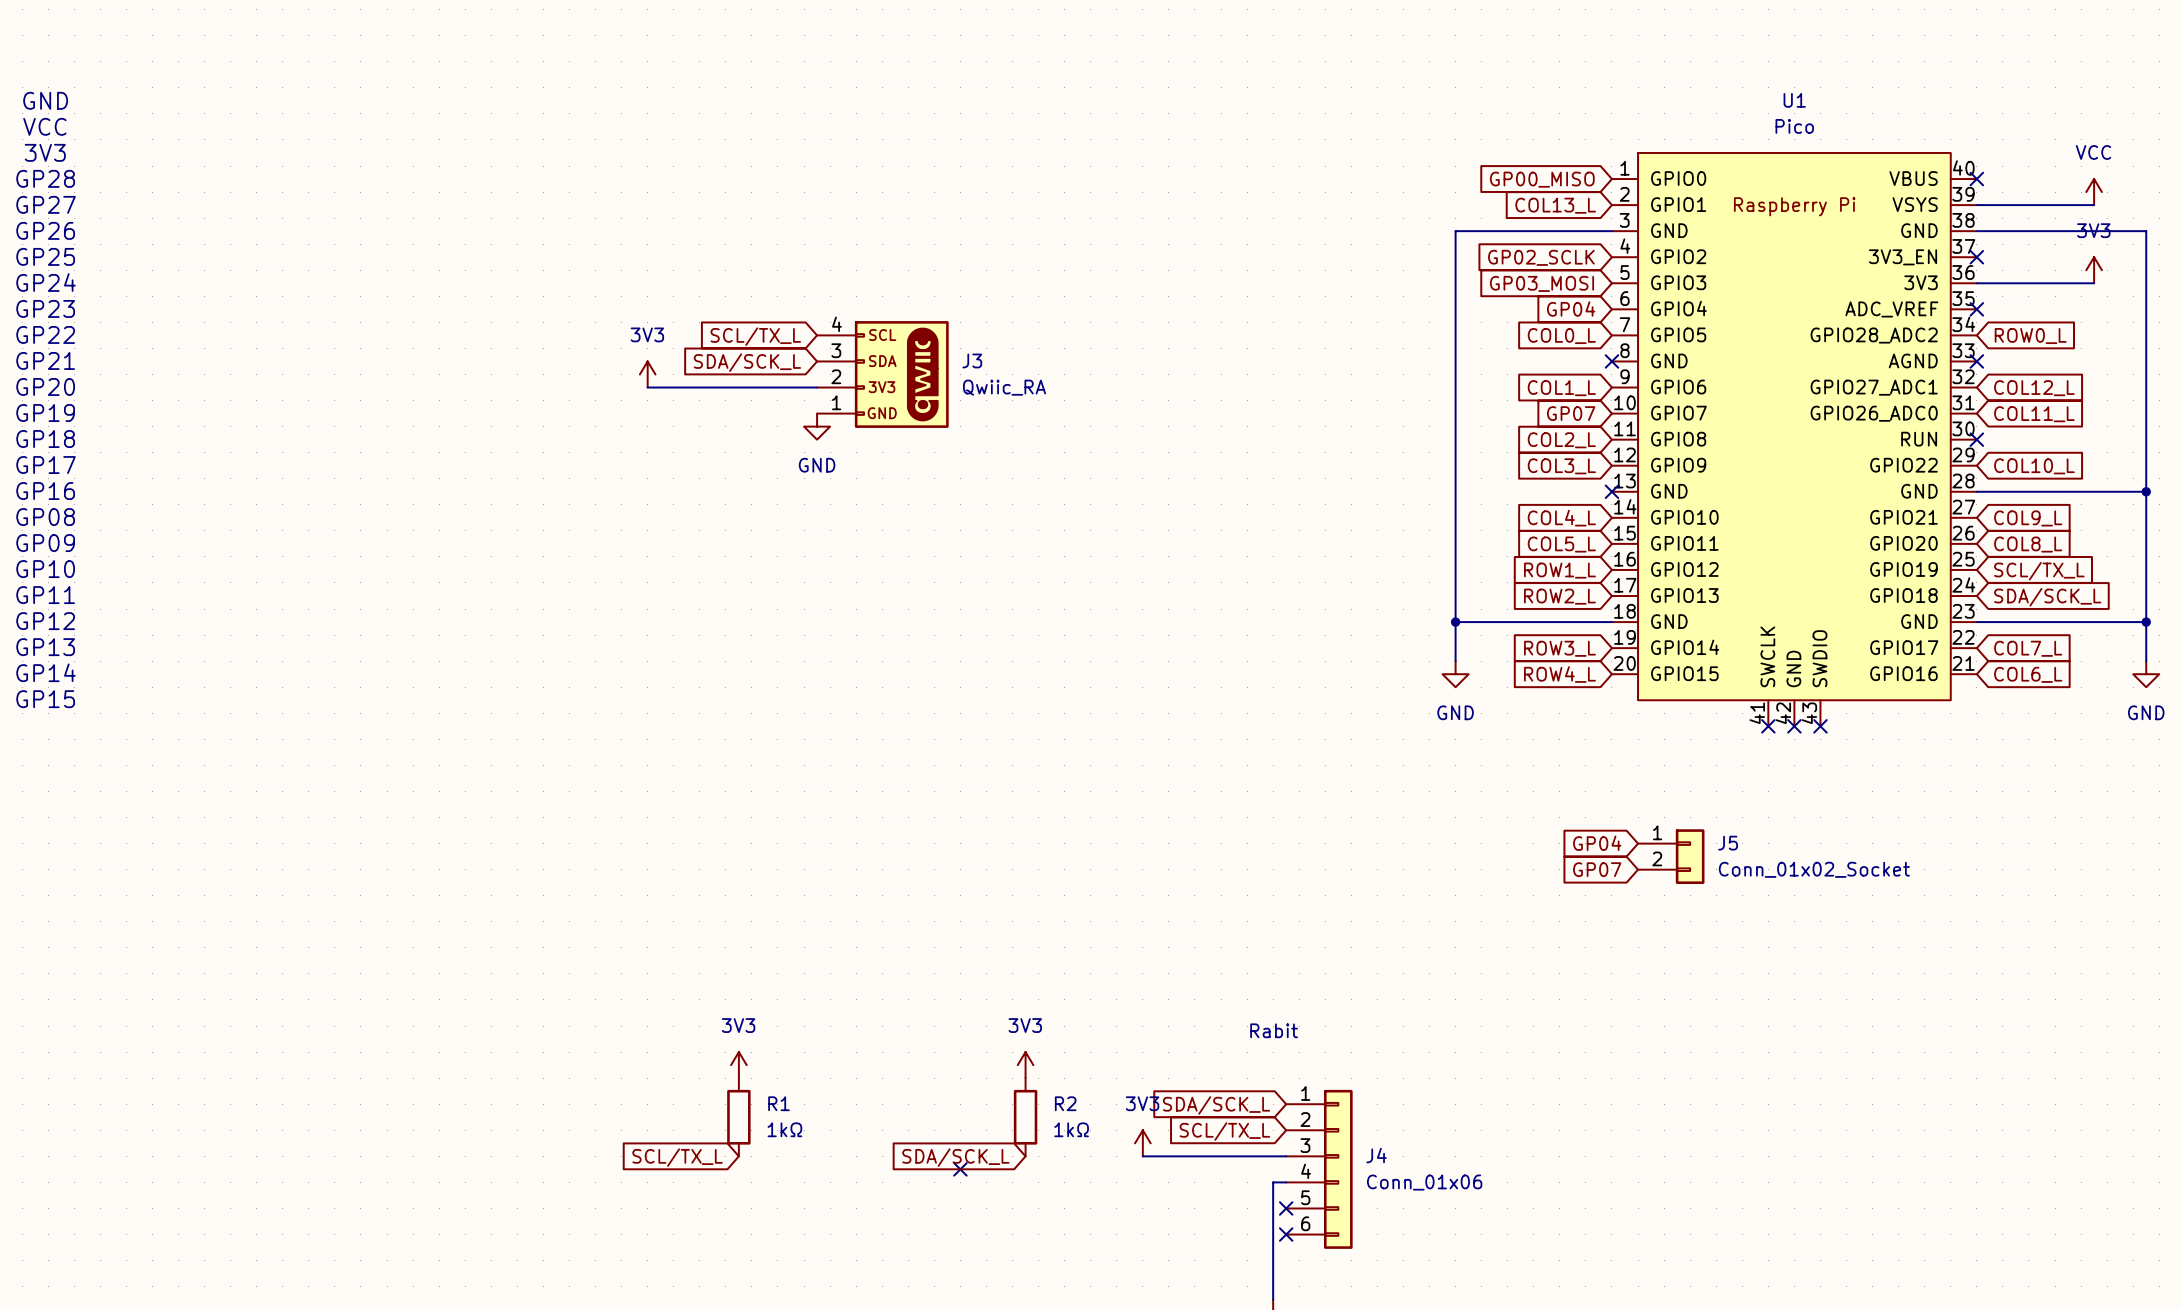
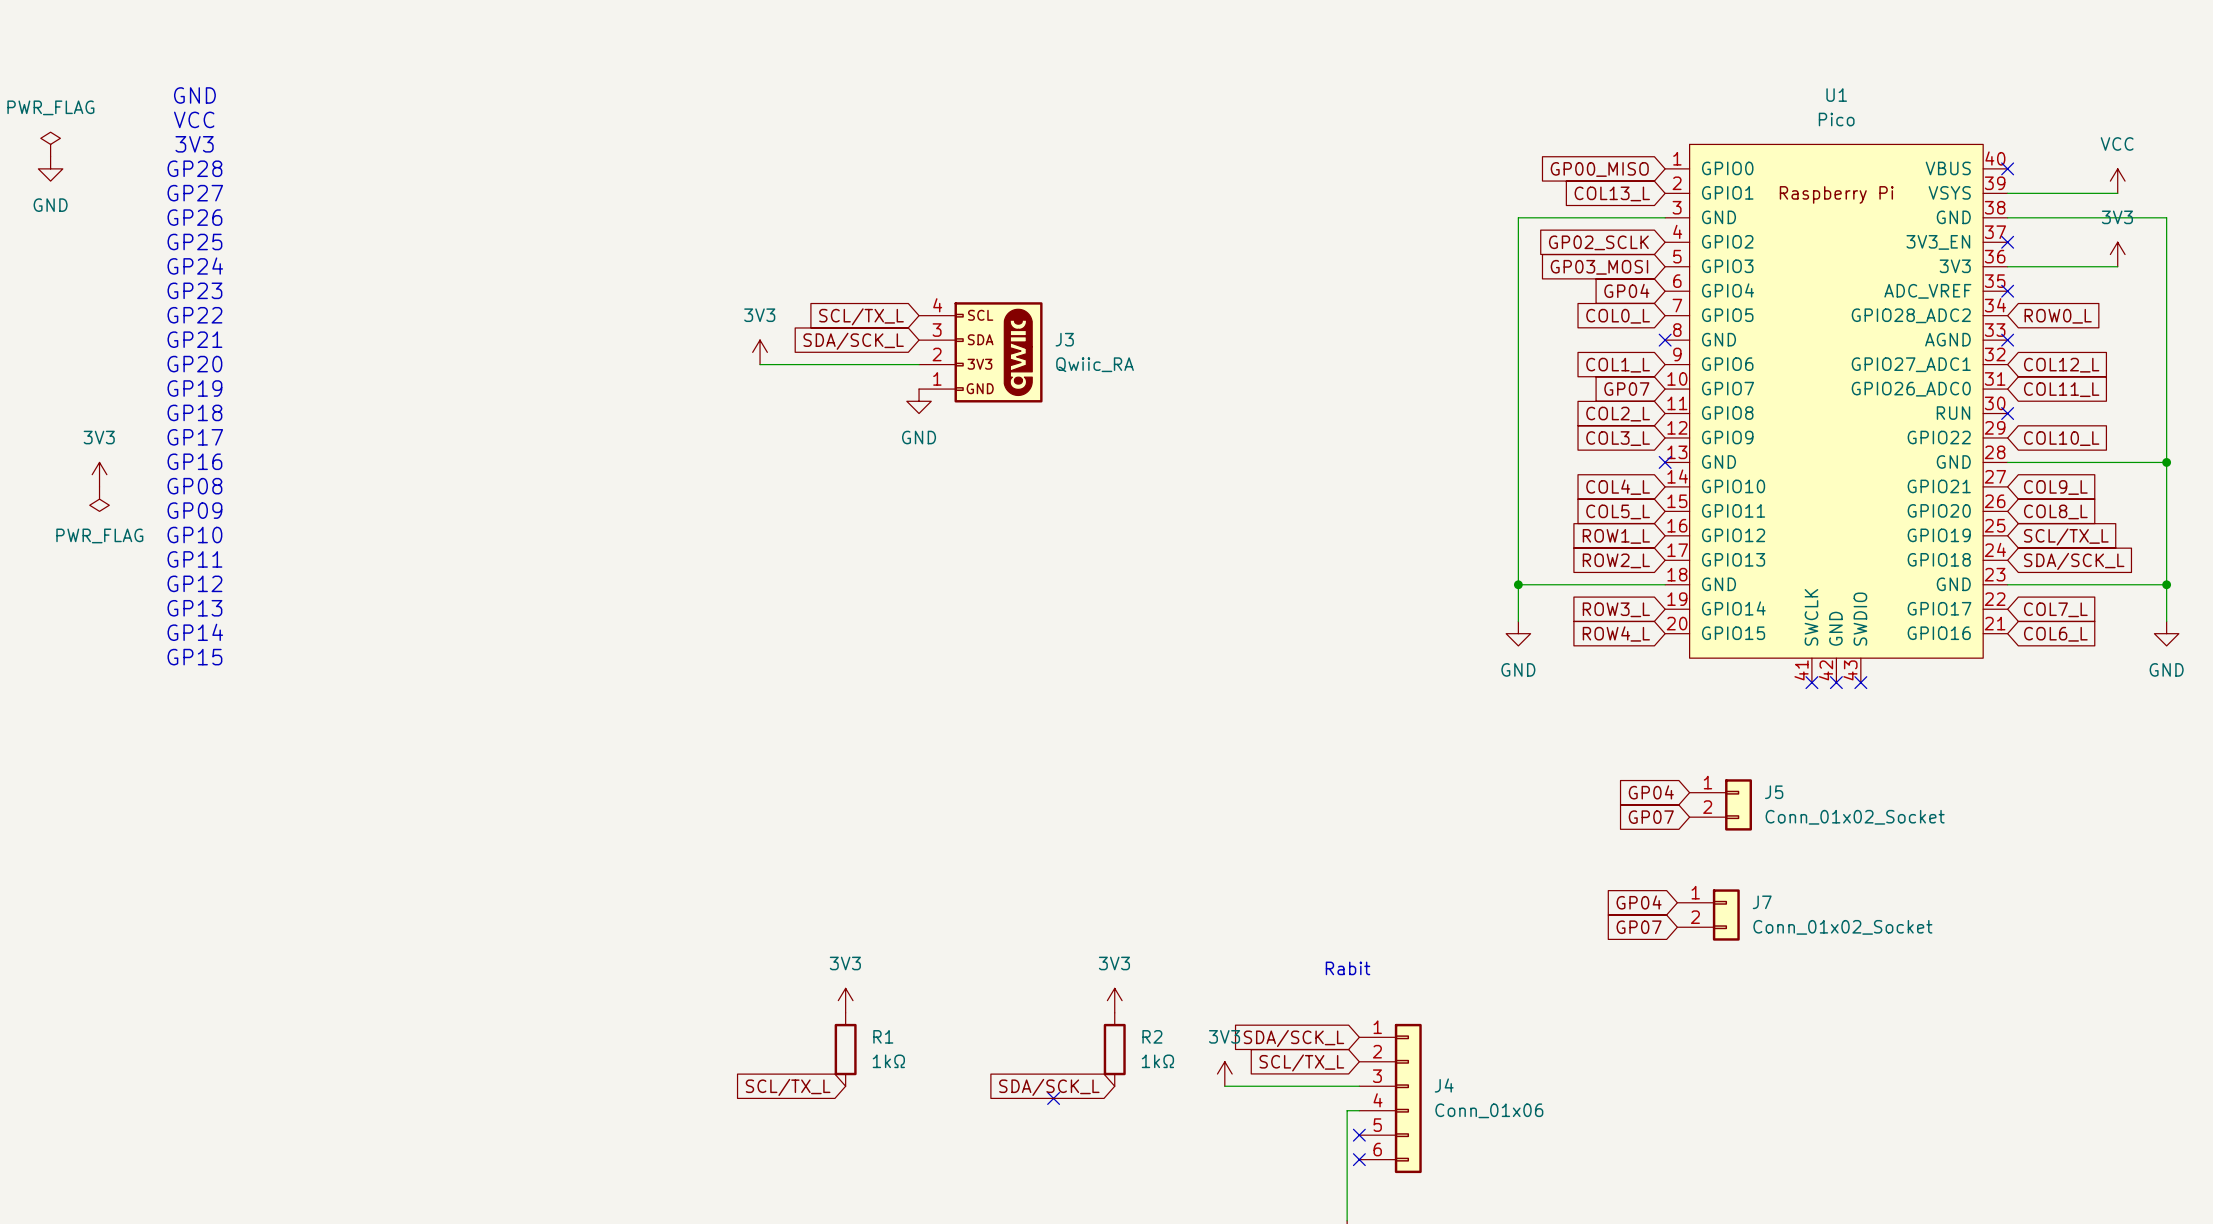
global label: none -> GP04 (1639, 902)
J7: none -> Conn_01x02_Socket (1708, 915)
global label: none -> GP07 (1639, 927)

